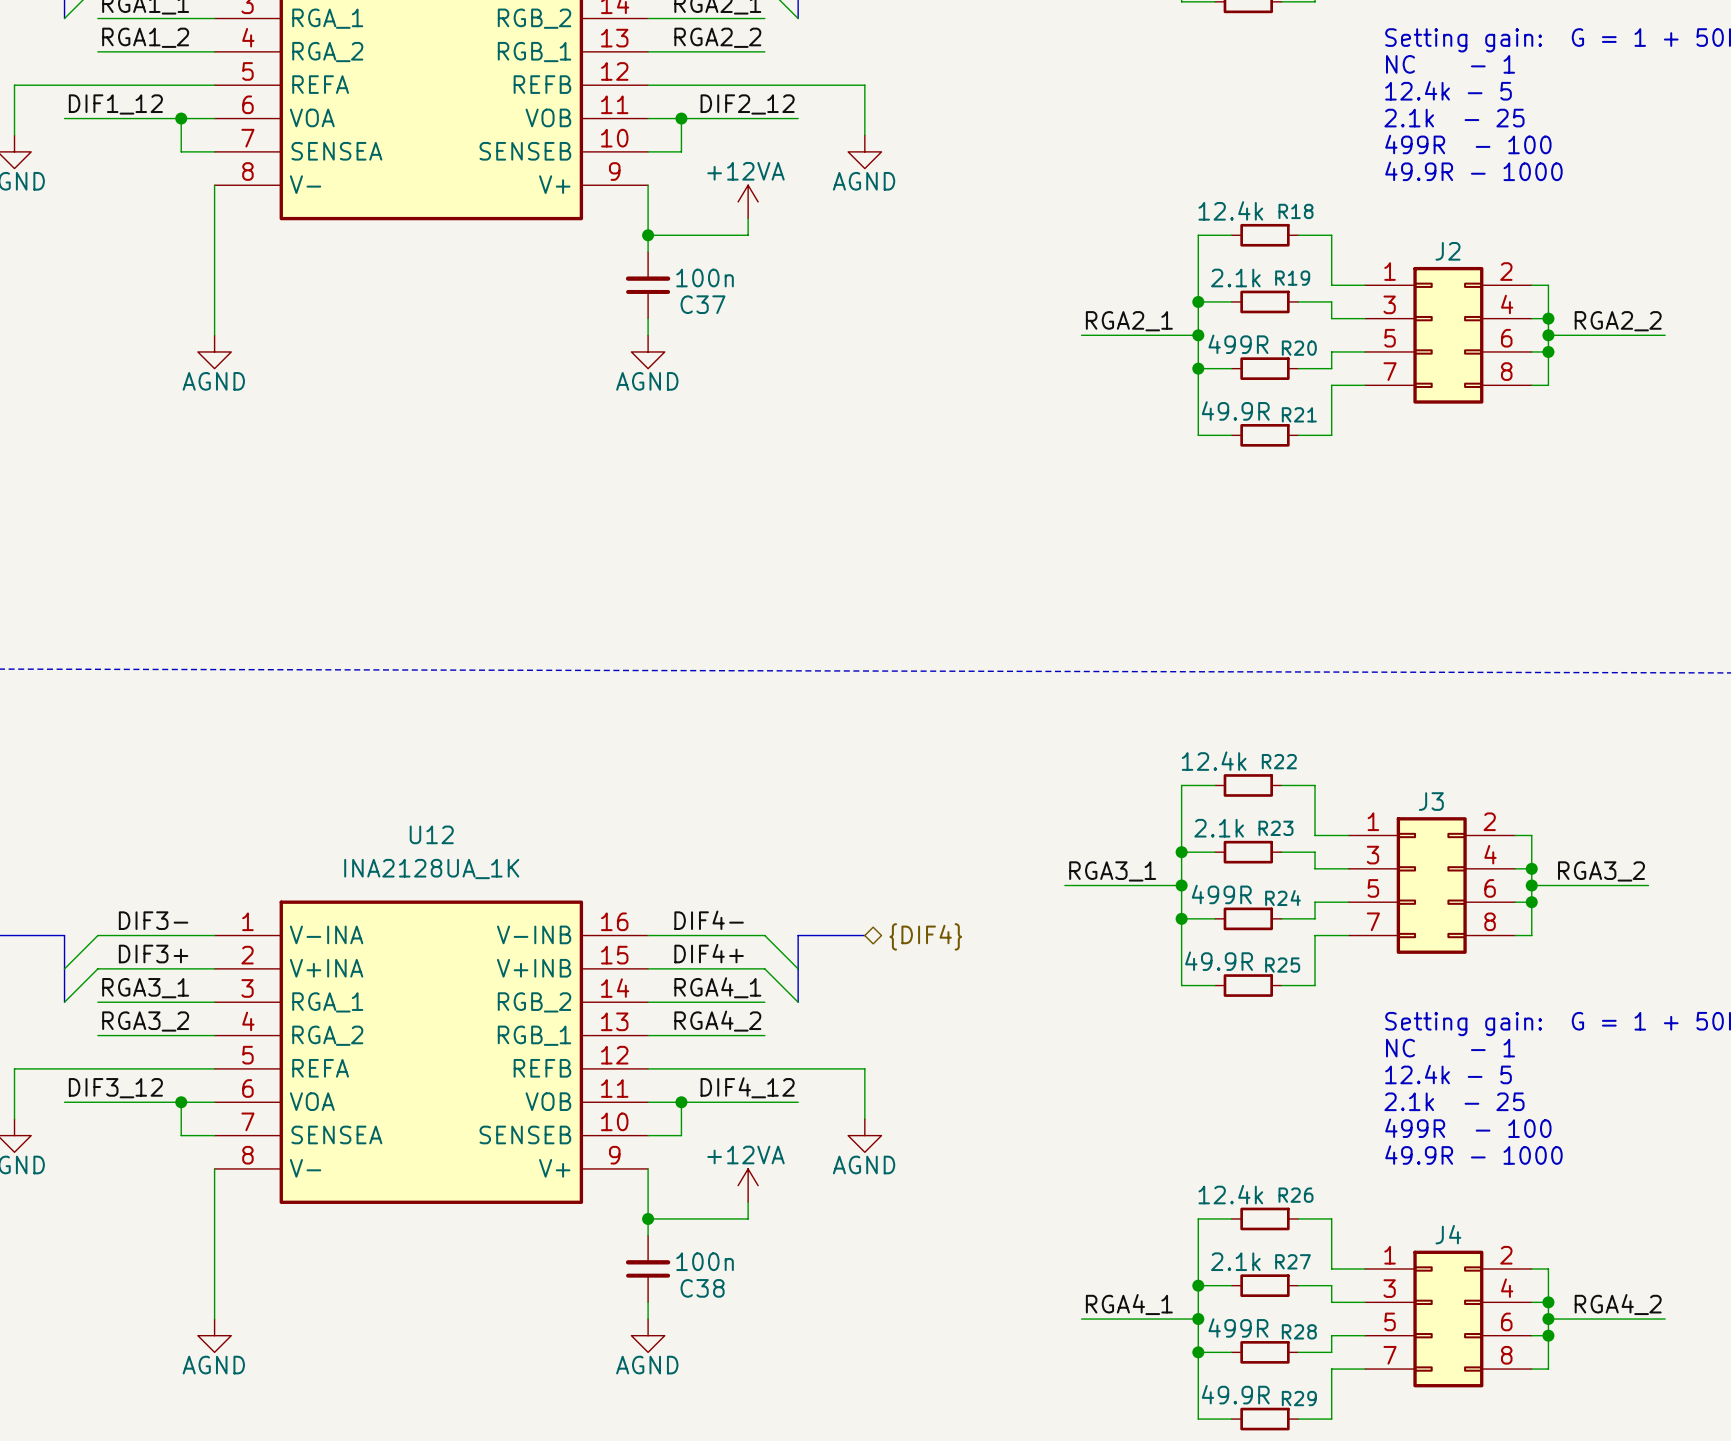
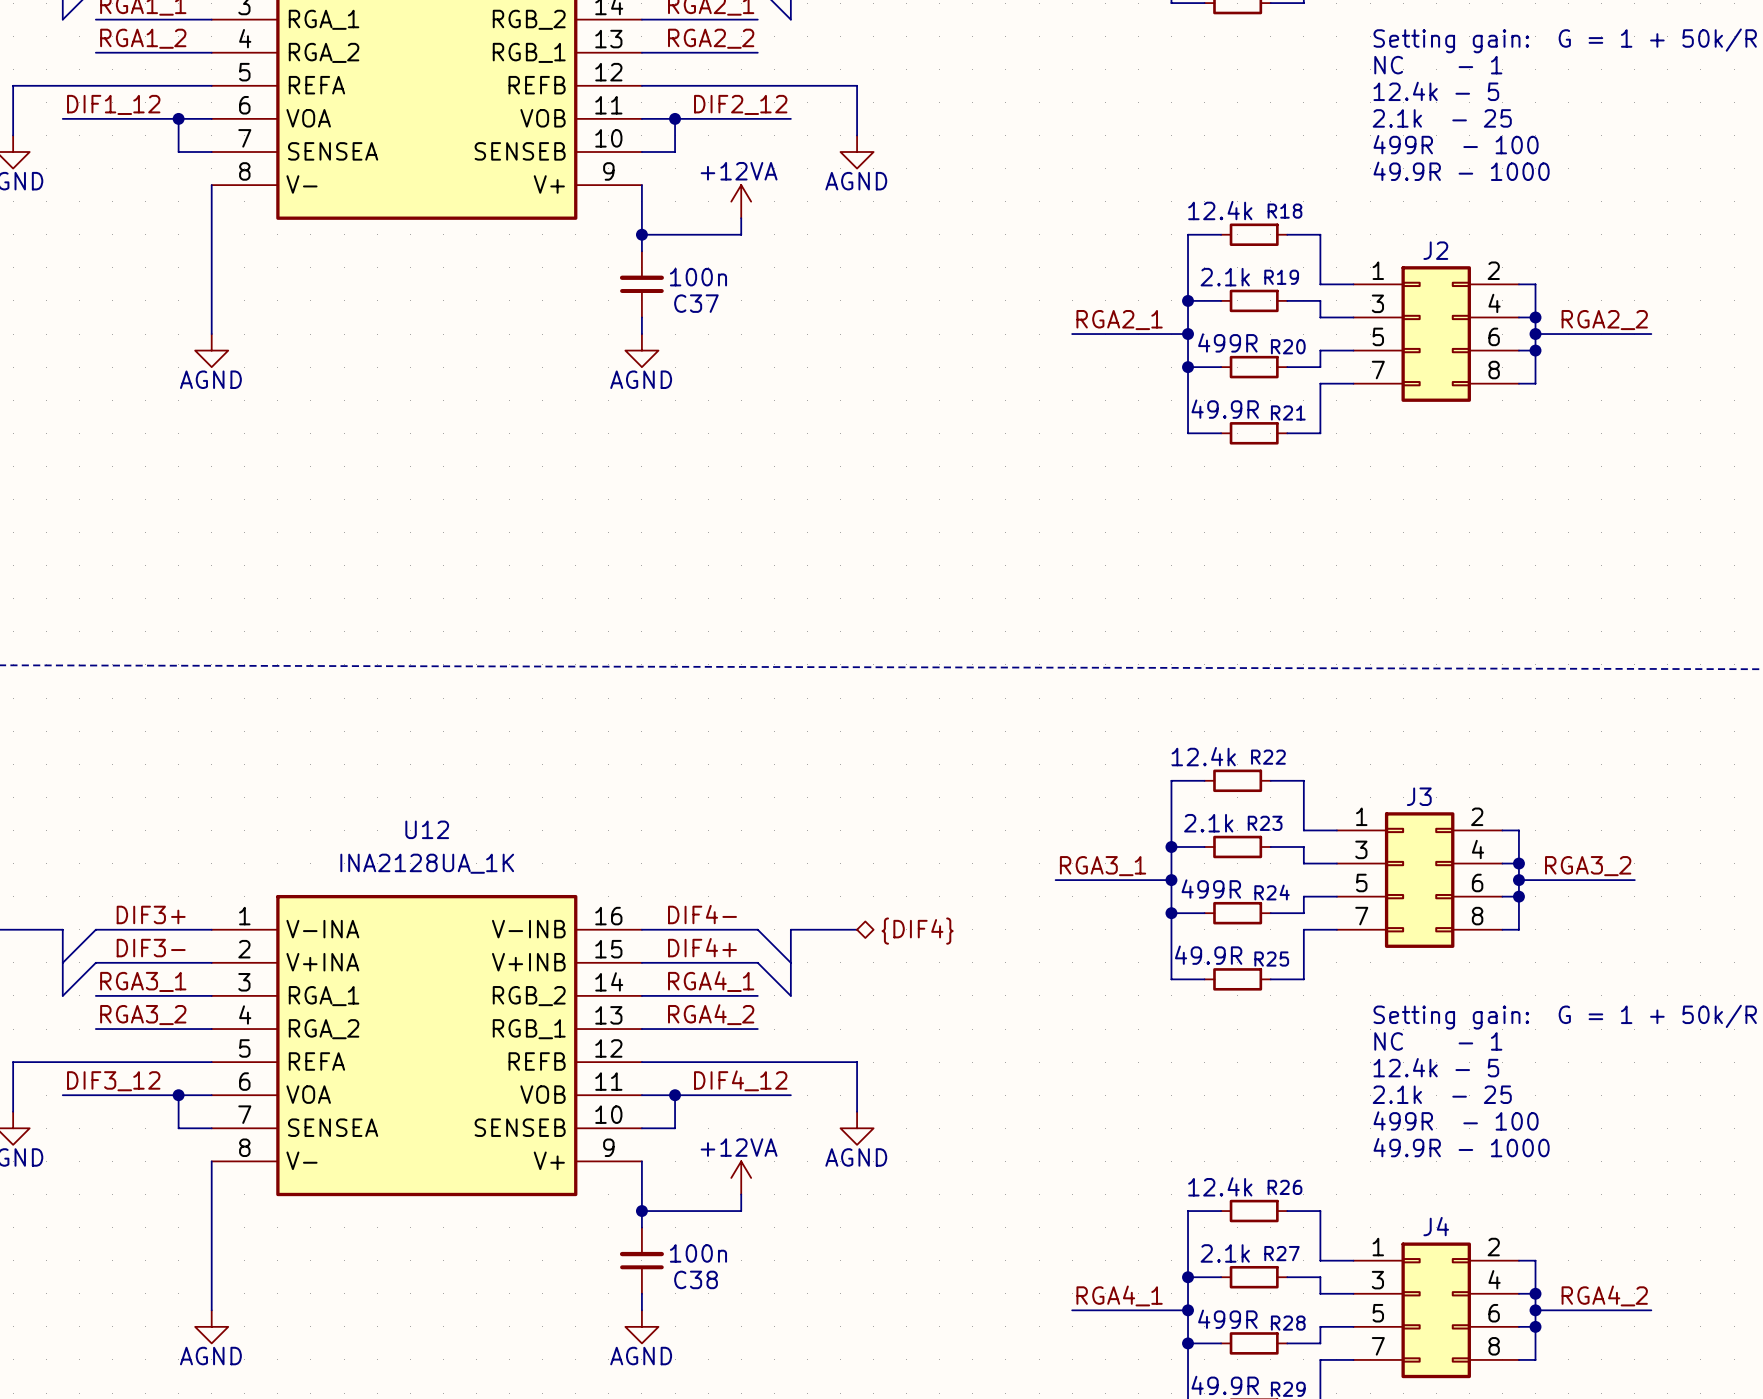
label: DIF3- (153, 920) -> DIF3+ (151, 914)
label: DIF3+ (153, 954) -> DIF3- (151, 948)

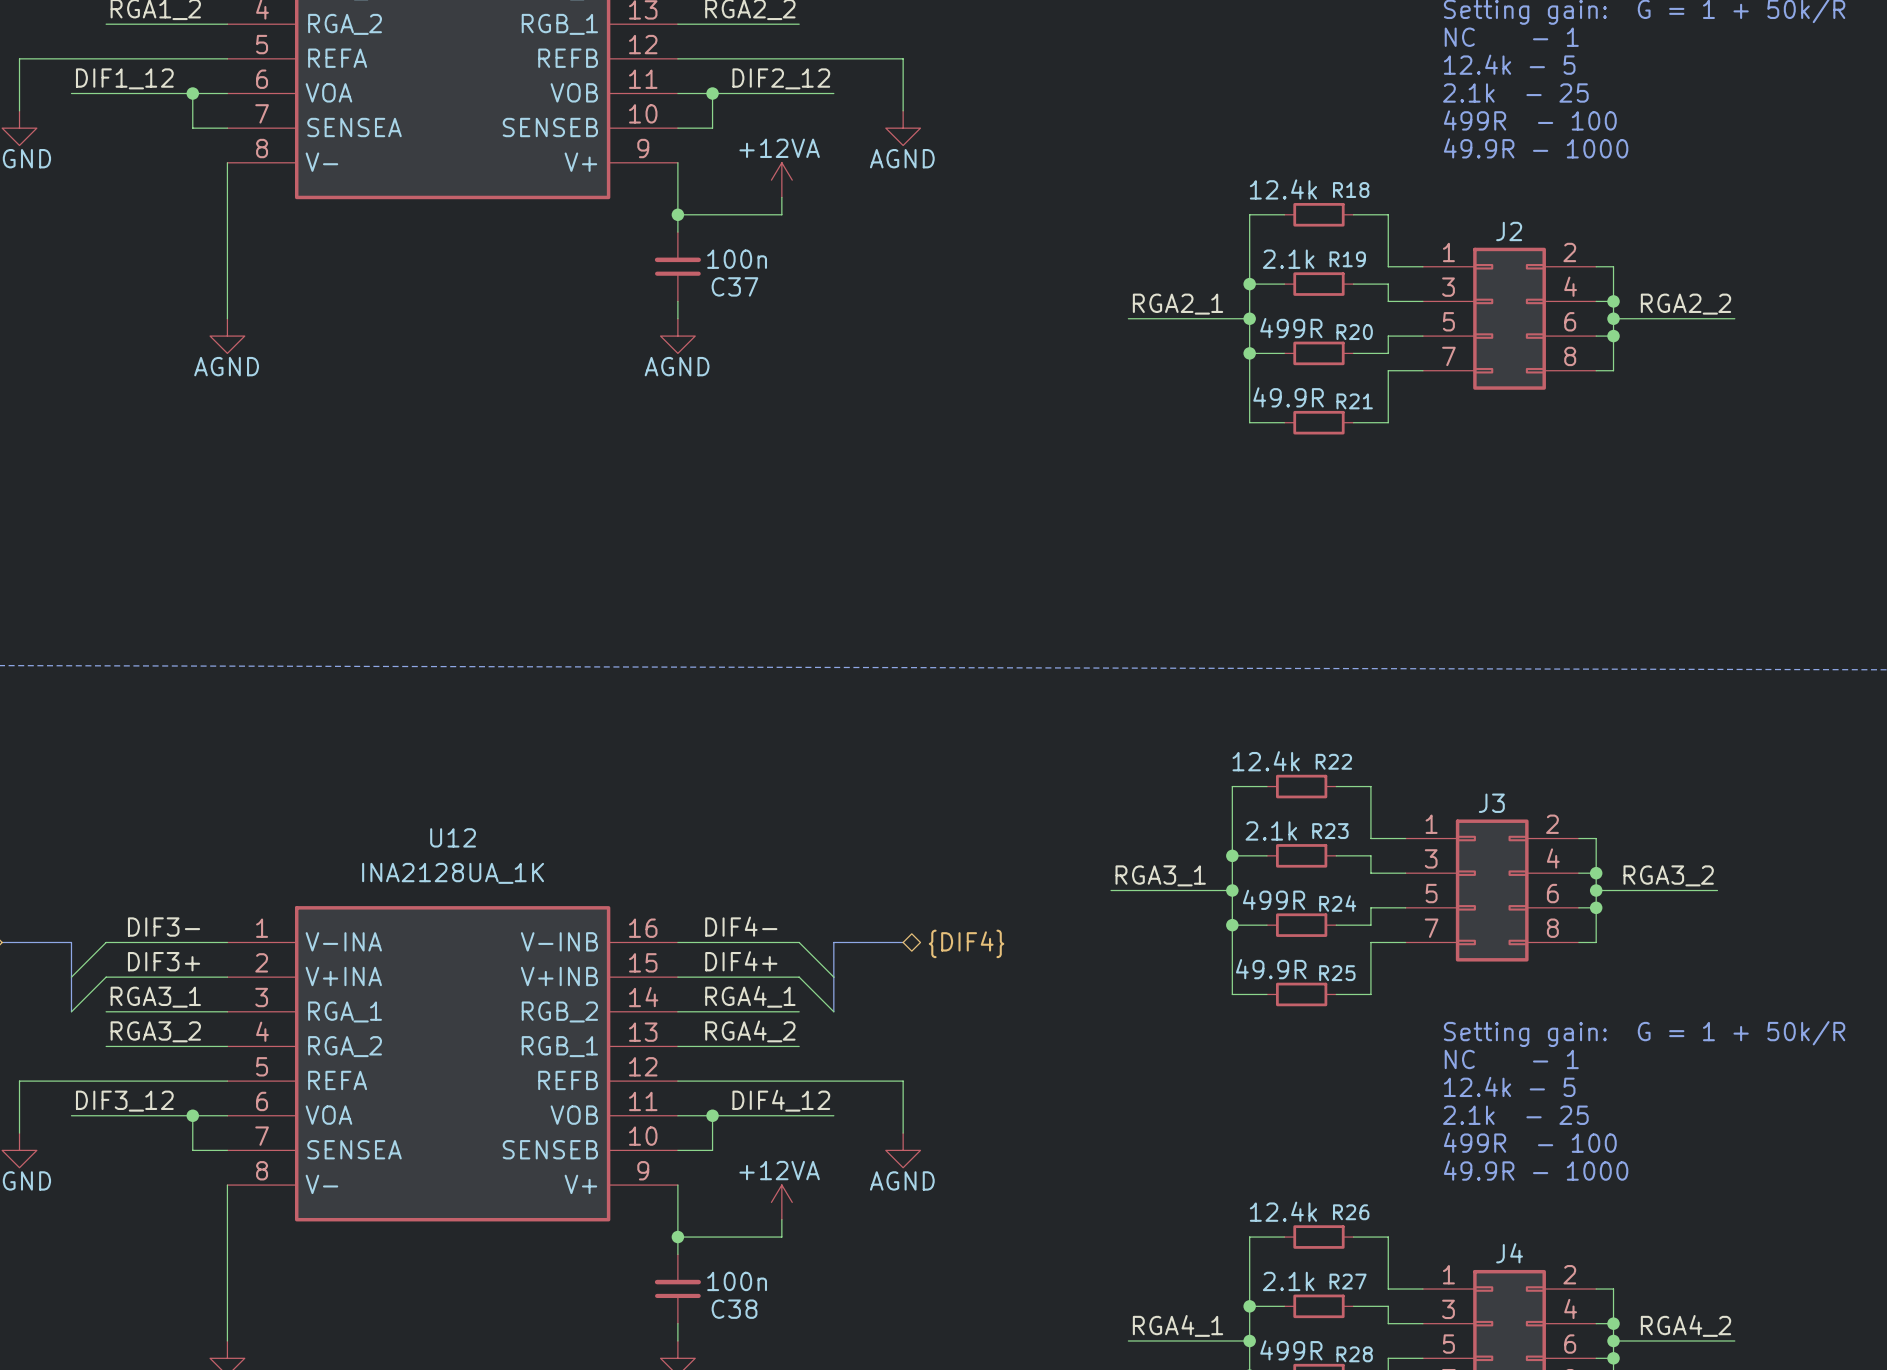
label: DIF3+ (151, 914) -> DIF3- (164, 927)
label: DIF3- (151, 948) -> DIF3+ (164, 961)

